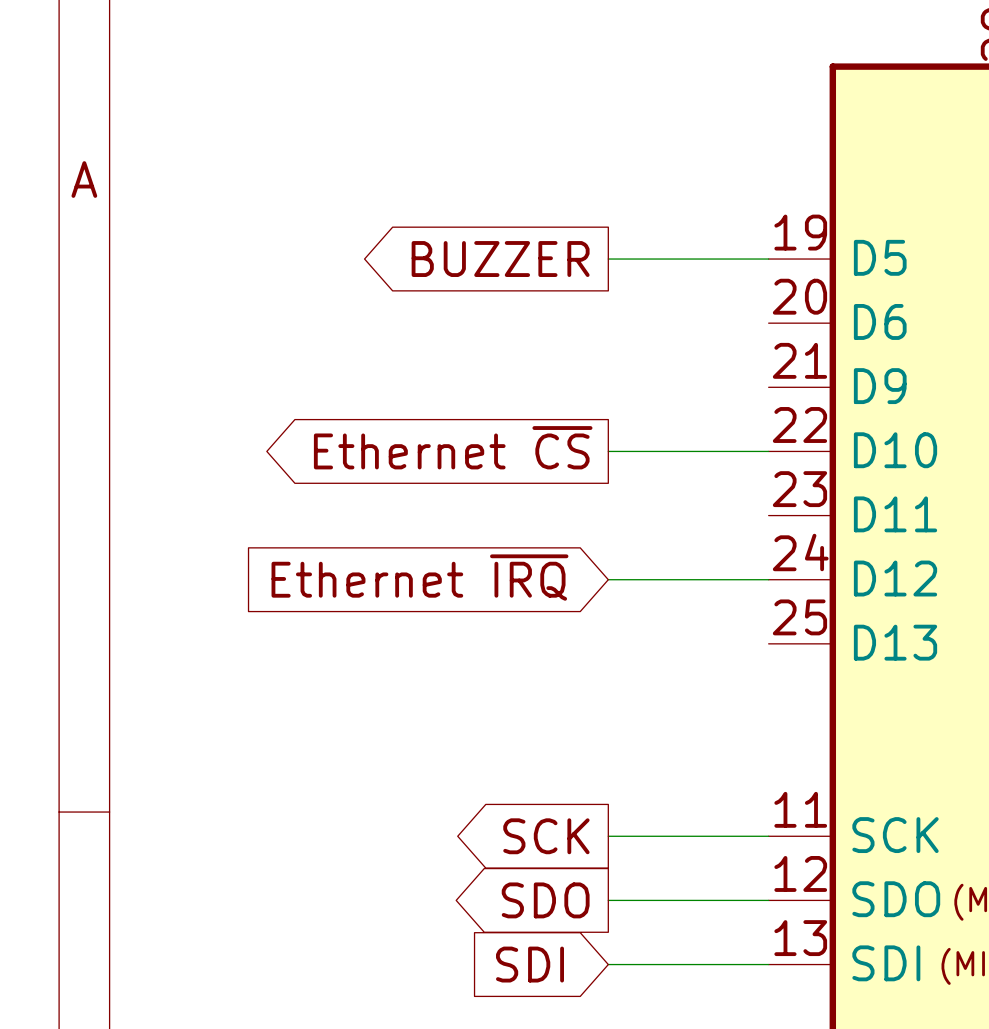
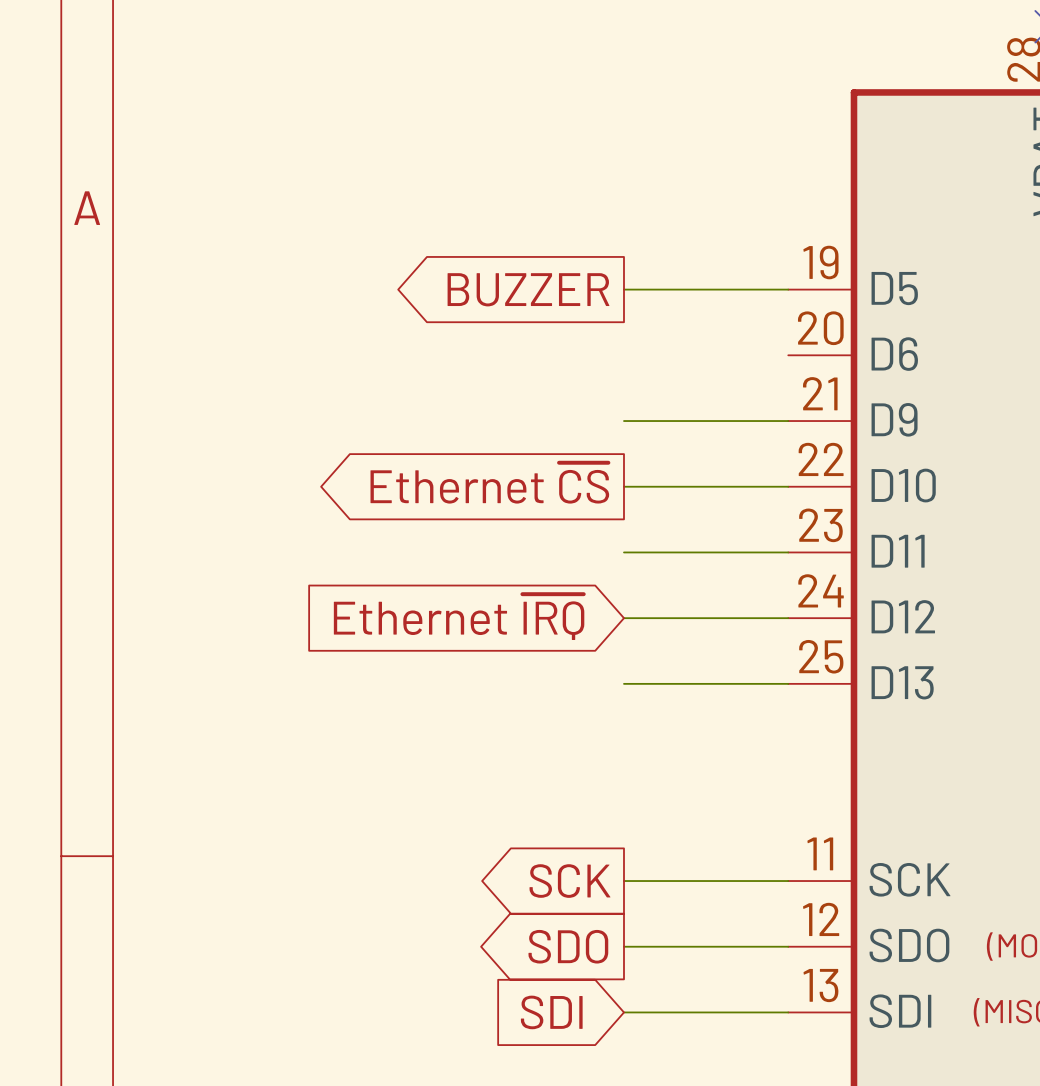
wire: none -> (623, 421) (788, 421)
wire: none -> (623, 552) (788, 552)
wire: none -> (623, 683) (788, 683)

